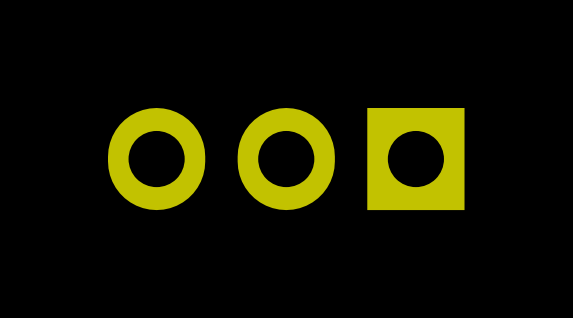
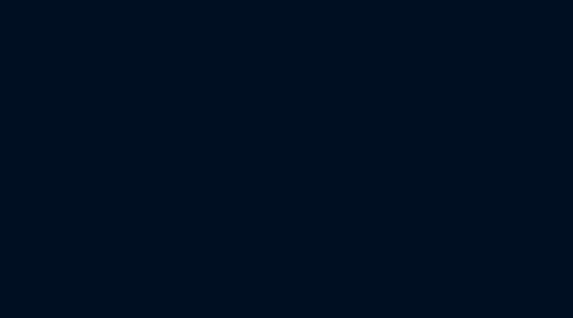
part: (286, 159) -> none

